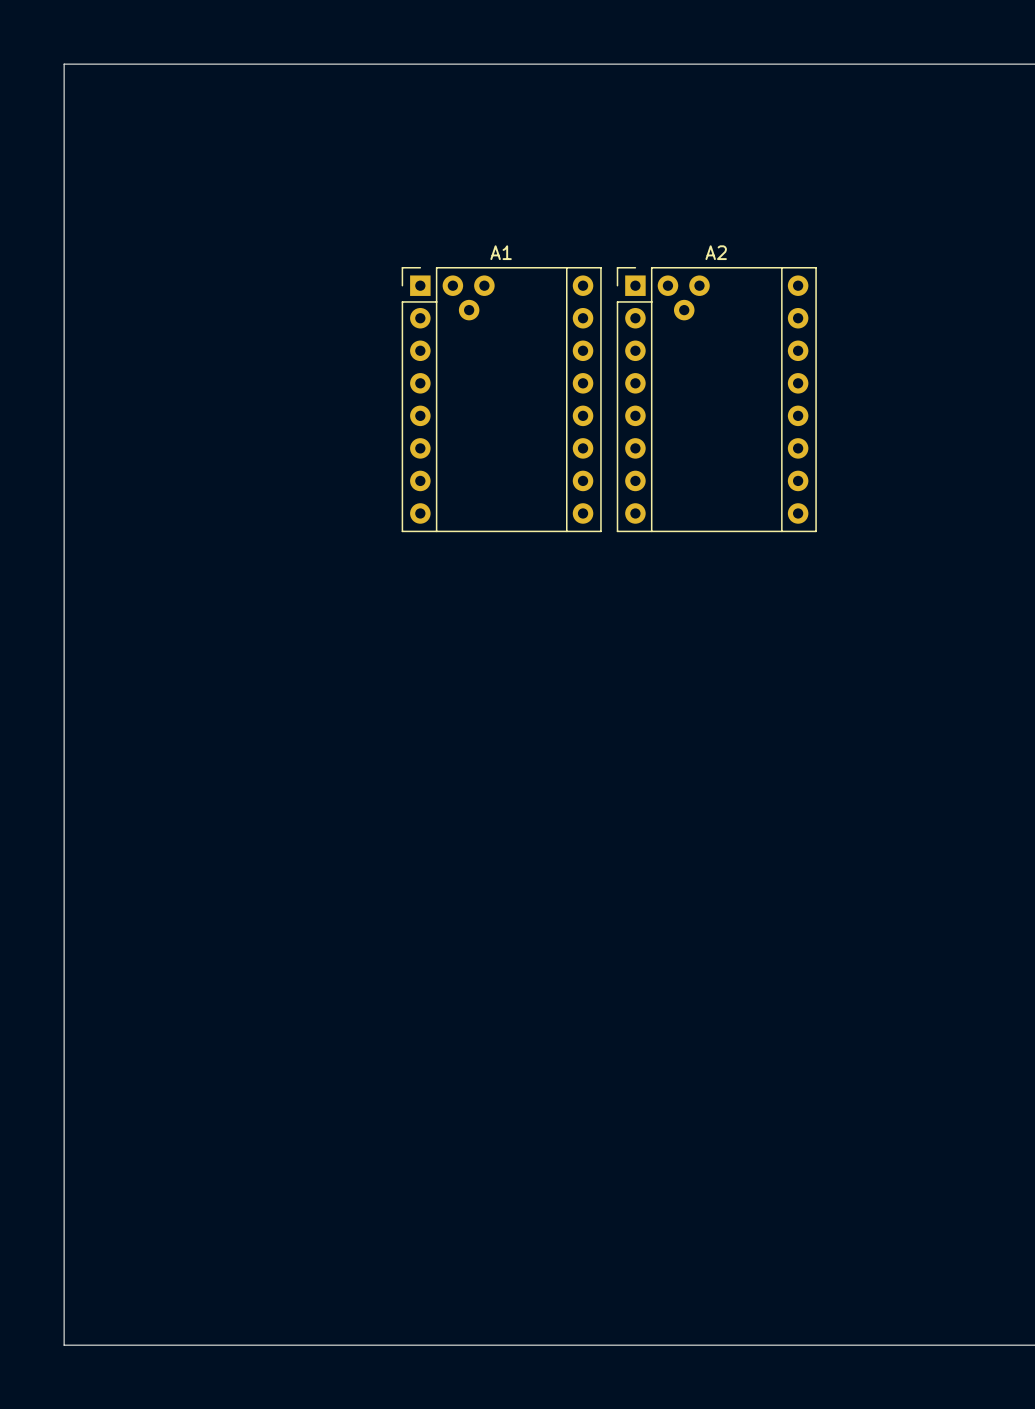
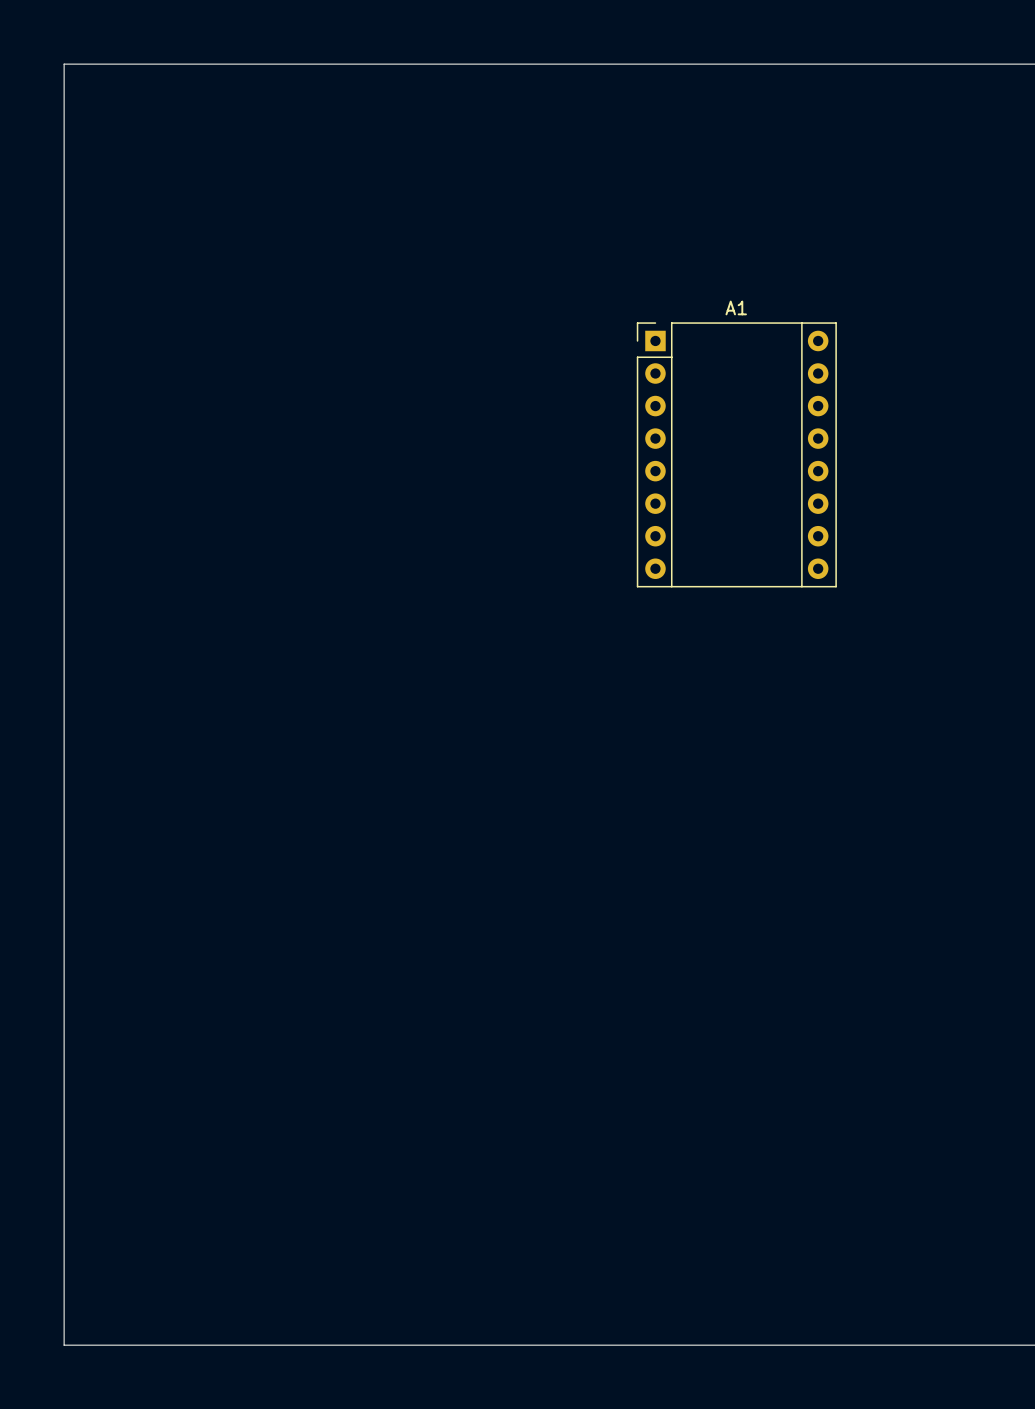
A1 footprint: [401, 266, 602, 533] -> [636, 322, 837, 588]
A2: (716, 399) -> none

